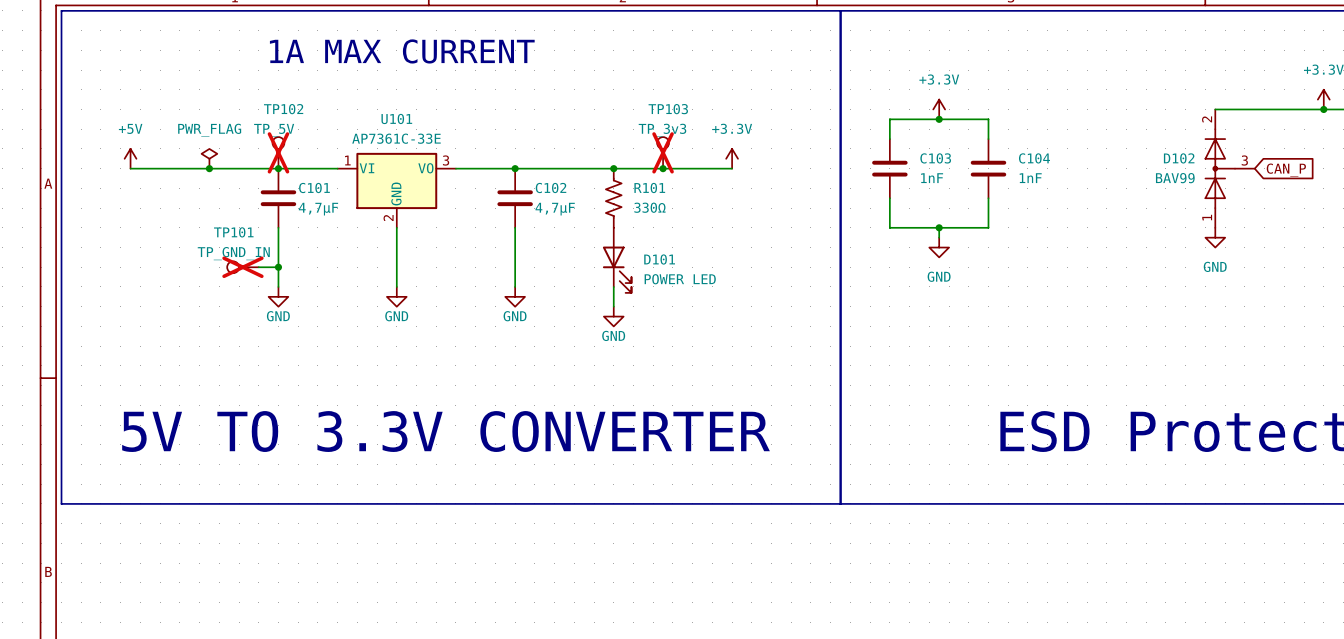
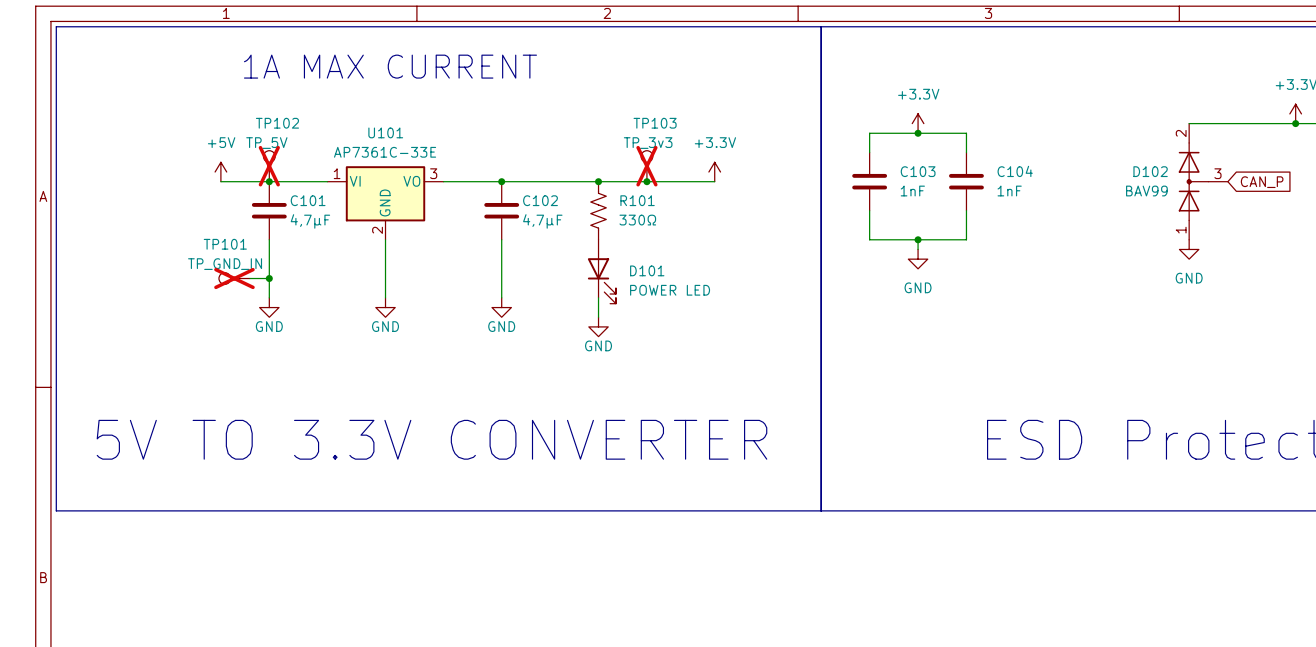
power symbol position: +5V (130, 158) -> +5V (220, 172)
power symbol: PWR_FLAG (209, 158) -> none
wire: (130, 168) (229, 168) -> none
junction: (209, 168) -> none

